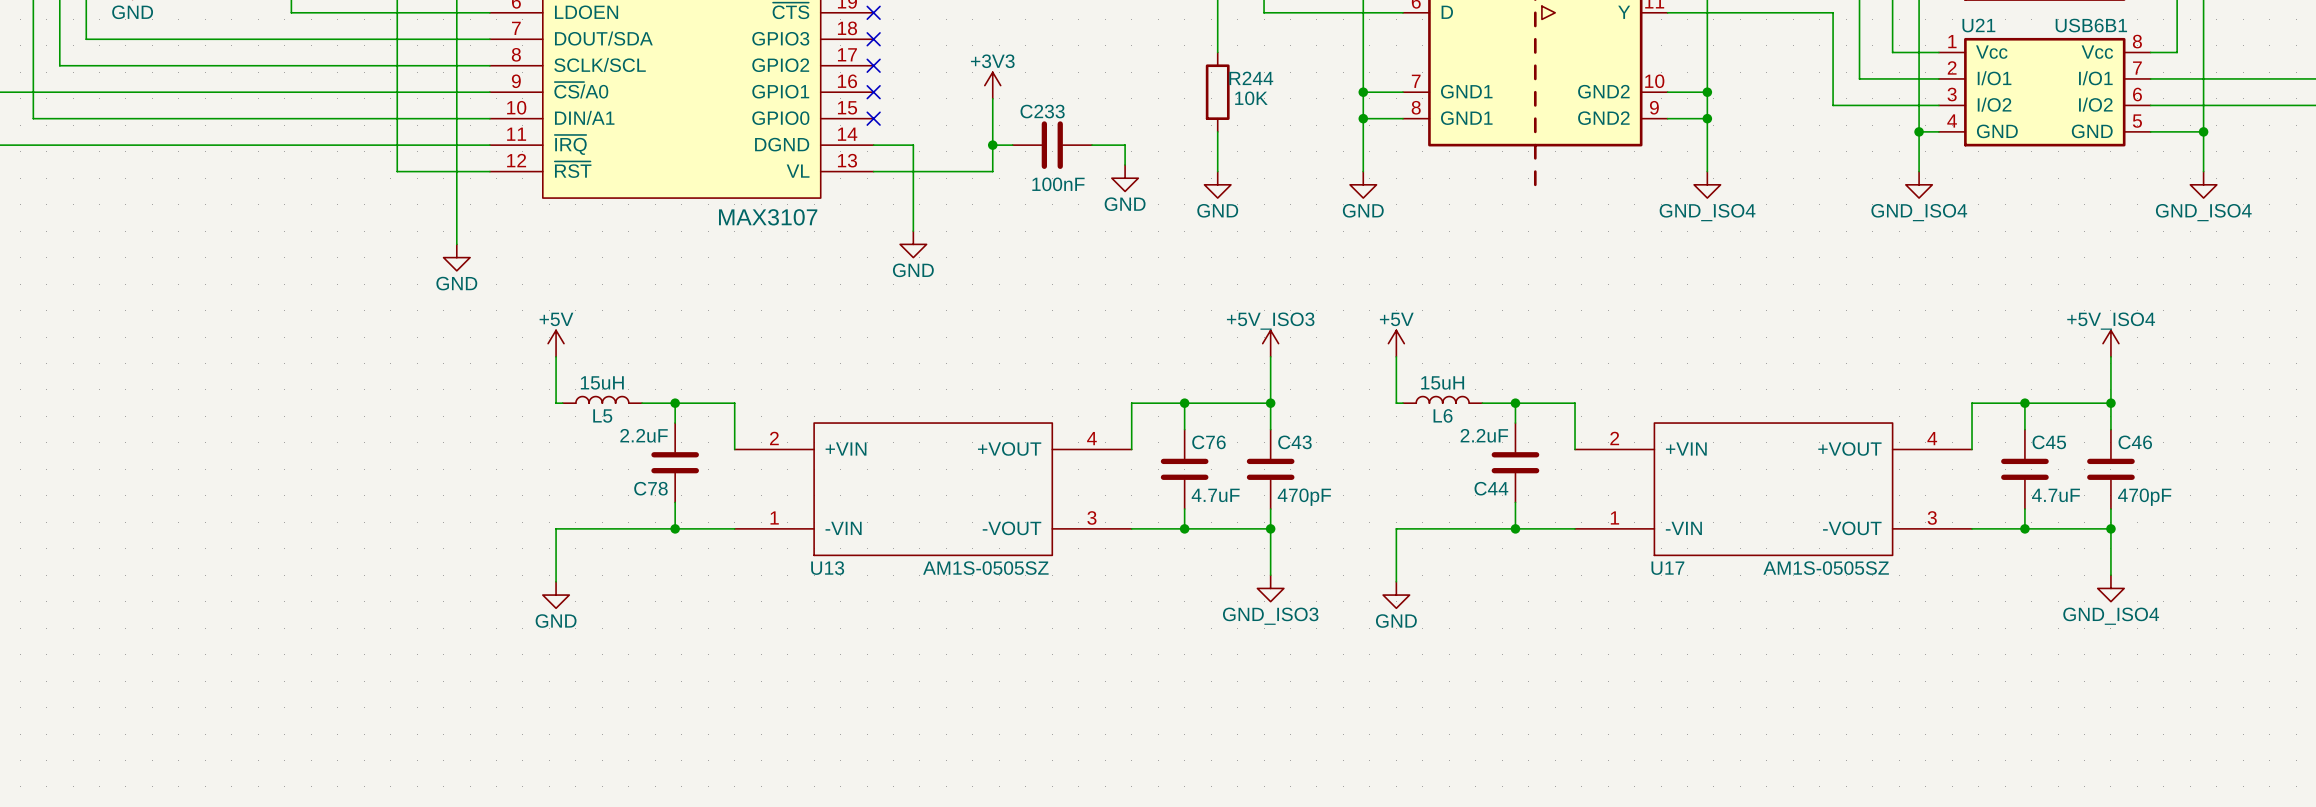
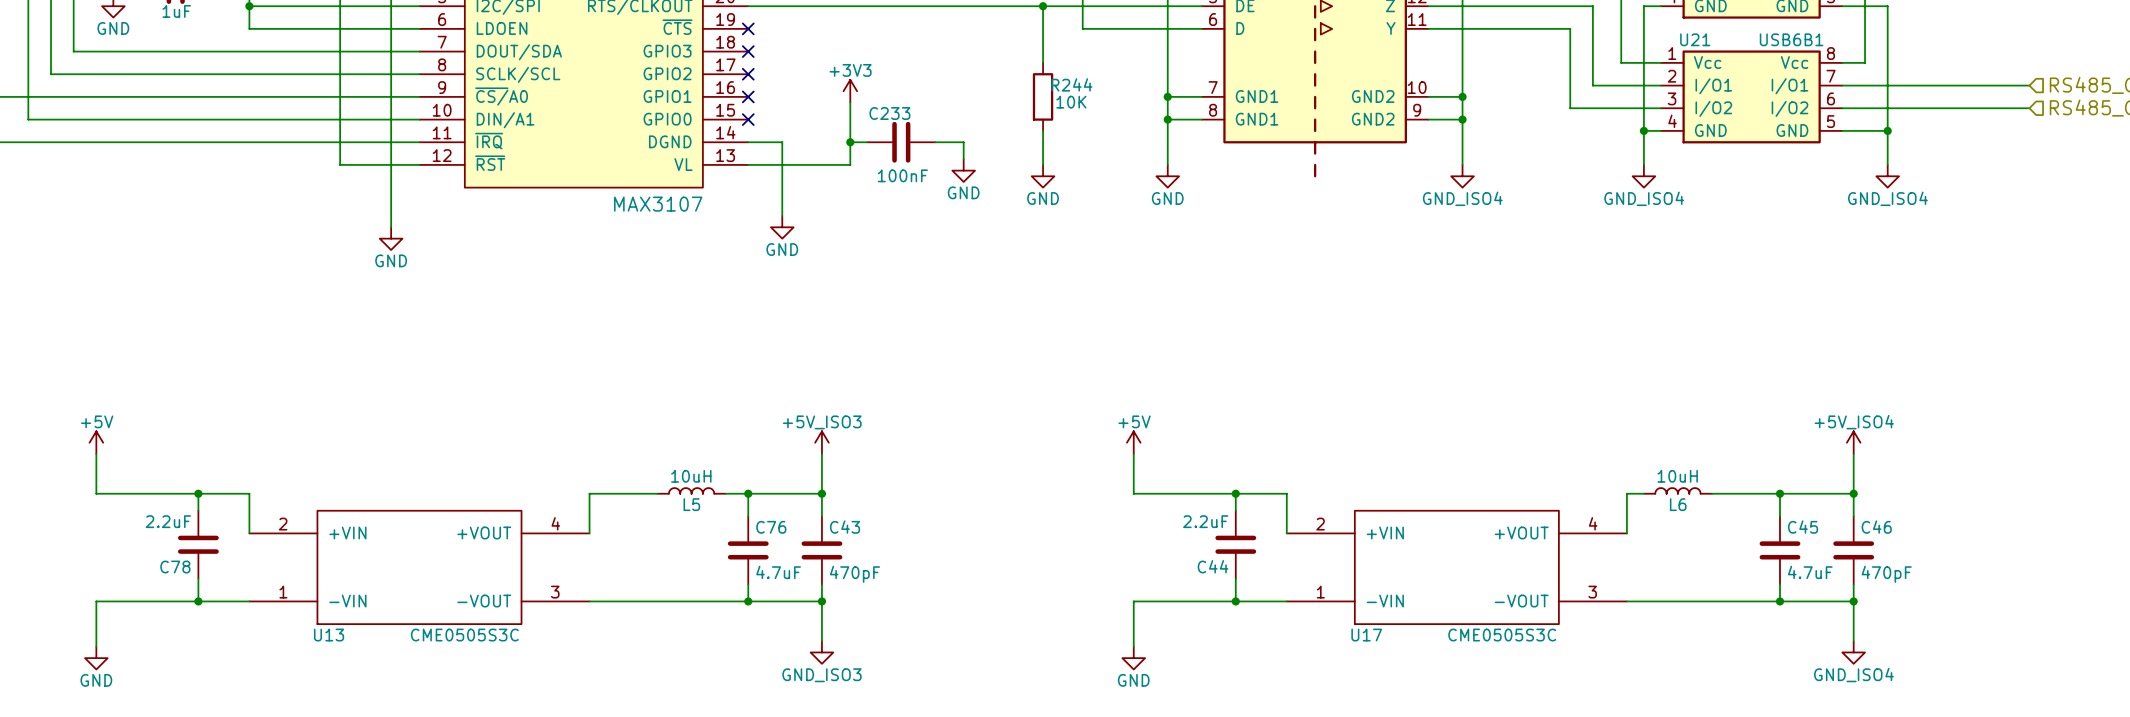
power symbol: +5V (556, 343) -> none
power symbol: +5V_ISO3 (1270, 343) -> none
power symbol position: +5V (1396, 343) -> +5V (1133, 442)
power symbol position: +5V_ISO4 (2110, 343) -> +5V_ISO4 (1853, 442)
wire: (556, 356) (556, 403) (562, 403) -> none
wire: (1270, 356) (1270, 429) -> none
wire: (1396, 356) (1396, 403) (1402, 403) -> none
wire: (2110, 356) (2110, 429) -> (1853, 454) (1853, 516)
L5 value: 15uH (602, 382) -> 10uH (691, 476)
L6 value: 15uH (1442, 382) -> 10uH (1677, 476)
L5 position: (602, 399) -> (691, 490)
L6 position: (1442, 399) -> (1677, 490)
wire: (642, 403) (734, 403) (734, 449) -> none
wire: (675, 403) (675, 423) -> none
junction: (675, 403) -> none
wire: (1184, 403) (1184, 429) -> none
junction: (1184, 403) -> none
wire: (1270, 403) (1131, 403) (1131, 449) -> none
junction: (1270, 403) -> none
wire: (1482, 403) (1575, 403) (1575, 449) -> none
wire: (1515, 403) (1515, 423) -> (1235, 493) (1235, 510)
junction: (1515, 403) -> none
wire: (2024, 403) (2024, 429) -> (1779, 493) (1779, 516)
junction: (2024, 403) -> none
wire: (2110, 403) (1972, 403) (1972, 449) -> none
junction: (2110, 403) -> none
C78 position: (675, 462) -> (198, 544)
C44 position: (1515, 462) -> (1235, 544)
C76 position: (1184, 469) -> (748, 550)
C43 position: (1270, 469) -> (821, 550)
C45 position: (2024, 469) -> (1779, 550)
C46 position: (2110, 469) -> (1853, 550)
U13 position: (933, 489) -> (419, 567)
U17 position: (1773, 489) -> (1456, 567)
power symbol: none -> +5V (96, 442)
power symbol: none -> +5V_ISO3 (821, 442)
wire: (675, 502) (675, 528) -> (748, 493) (748, 516)
wire: (1515, 502) (1515, 528) -> (1235, 578) (1235, 601)
wire: none -> (96, 454) (96, 493) (249, 493) (249, 533)
wire: none -> (821, 454) (821, 516)
wire: (1184, 509) (1184, 528) -> none
wire: (1270, 509) (1270, 575) -> none
wire: none -> (1133, 454) (1133, 493) (1286, 493) (1286, 533)
wire: (2024, 509) (2024, 528) -> (1779, 584) (1779, 601)
wire: (2110, 509) (2110, 575) -> (1853, 584) (1853, 641)
junction: (675, 528) -> none
wire: (734, 528) (556, 528) (556, 581) -> none
wire: (1131, 528) (1270, 528) -> none
junction: (1184, 528) -> none
junction: (1270, 528) -> none
junction: (1515, 528) -> none
wire: (1575, 528) (1396, 528) (1396, 581) -> (1286, 601) (1133, 601) (1133, 646)
wire: (1972, 528) (2110, 528) -> none
junction: (2024, 528) -> none
junction: (2110, 528) -> none
wire: none -> (198, 493) (198, 510)
junction: none -> (198, 493)
wire: none -> (657, 493) (589, 493) (589, 533)
junction: none -> (748, 493)
junction: none -> (821, 493)
junction: none -> (1235, 493)
wire: none -> (1643, 493) (1626, 493) (1626, 533)
wire: none -> (1711, 493) (1853, 493)
junction: none -> (1779, 493)
junction: none -> (1853, 493)
U13 value: AM1S-0505SZ (985, 568) -> CME0505S3C (464, 635)
U17 value: AM1S-0505SZ (1826, 568) -> CME0505S3C (1502, 635)
power symbol: GND_ISO3 (1270, 588) -> none
power symbol position: GND_ISO4 (2110, 588) -> GND_ISO4 (1853, 652)
power symbol: GND (556, 595) -> none
power symbol position: GND (1396, 595) -> GND (1133, 658)
wire: none -> (198, 578) (198, 601)
wire: none -> (748, 584) (748, 601)
wire: none -> (821, 584) (821, 641)
junction: none -> (198, 601)
wire: none -> (249, 601) (96, 601) (96, 646)
wire: none -> (589, 601) (821, 601)
junction: none -> (748, 601)
junction: none -> (821, 601)
junction: none -> (1235, 601)
wire: none -> (1626, 601) (1853, 601)
junction: none -> (1779, 601)
junction: none -> (1853, 601)
power symbol: none -> GND_ISO3 (821, 652)
power symbol: none -> GND (96, 658)

